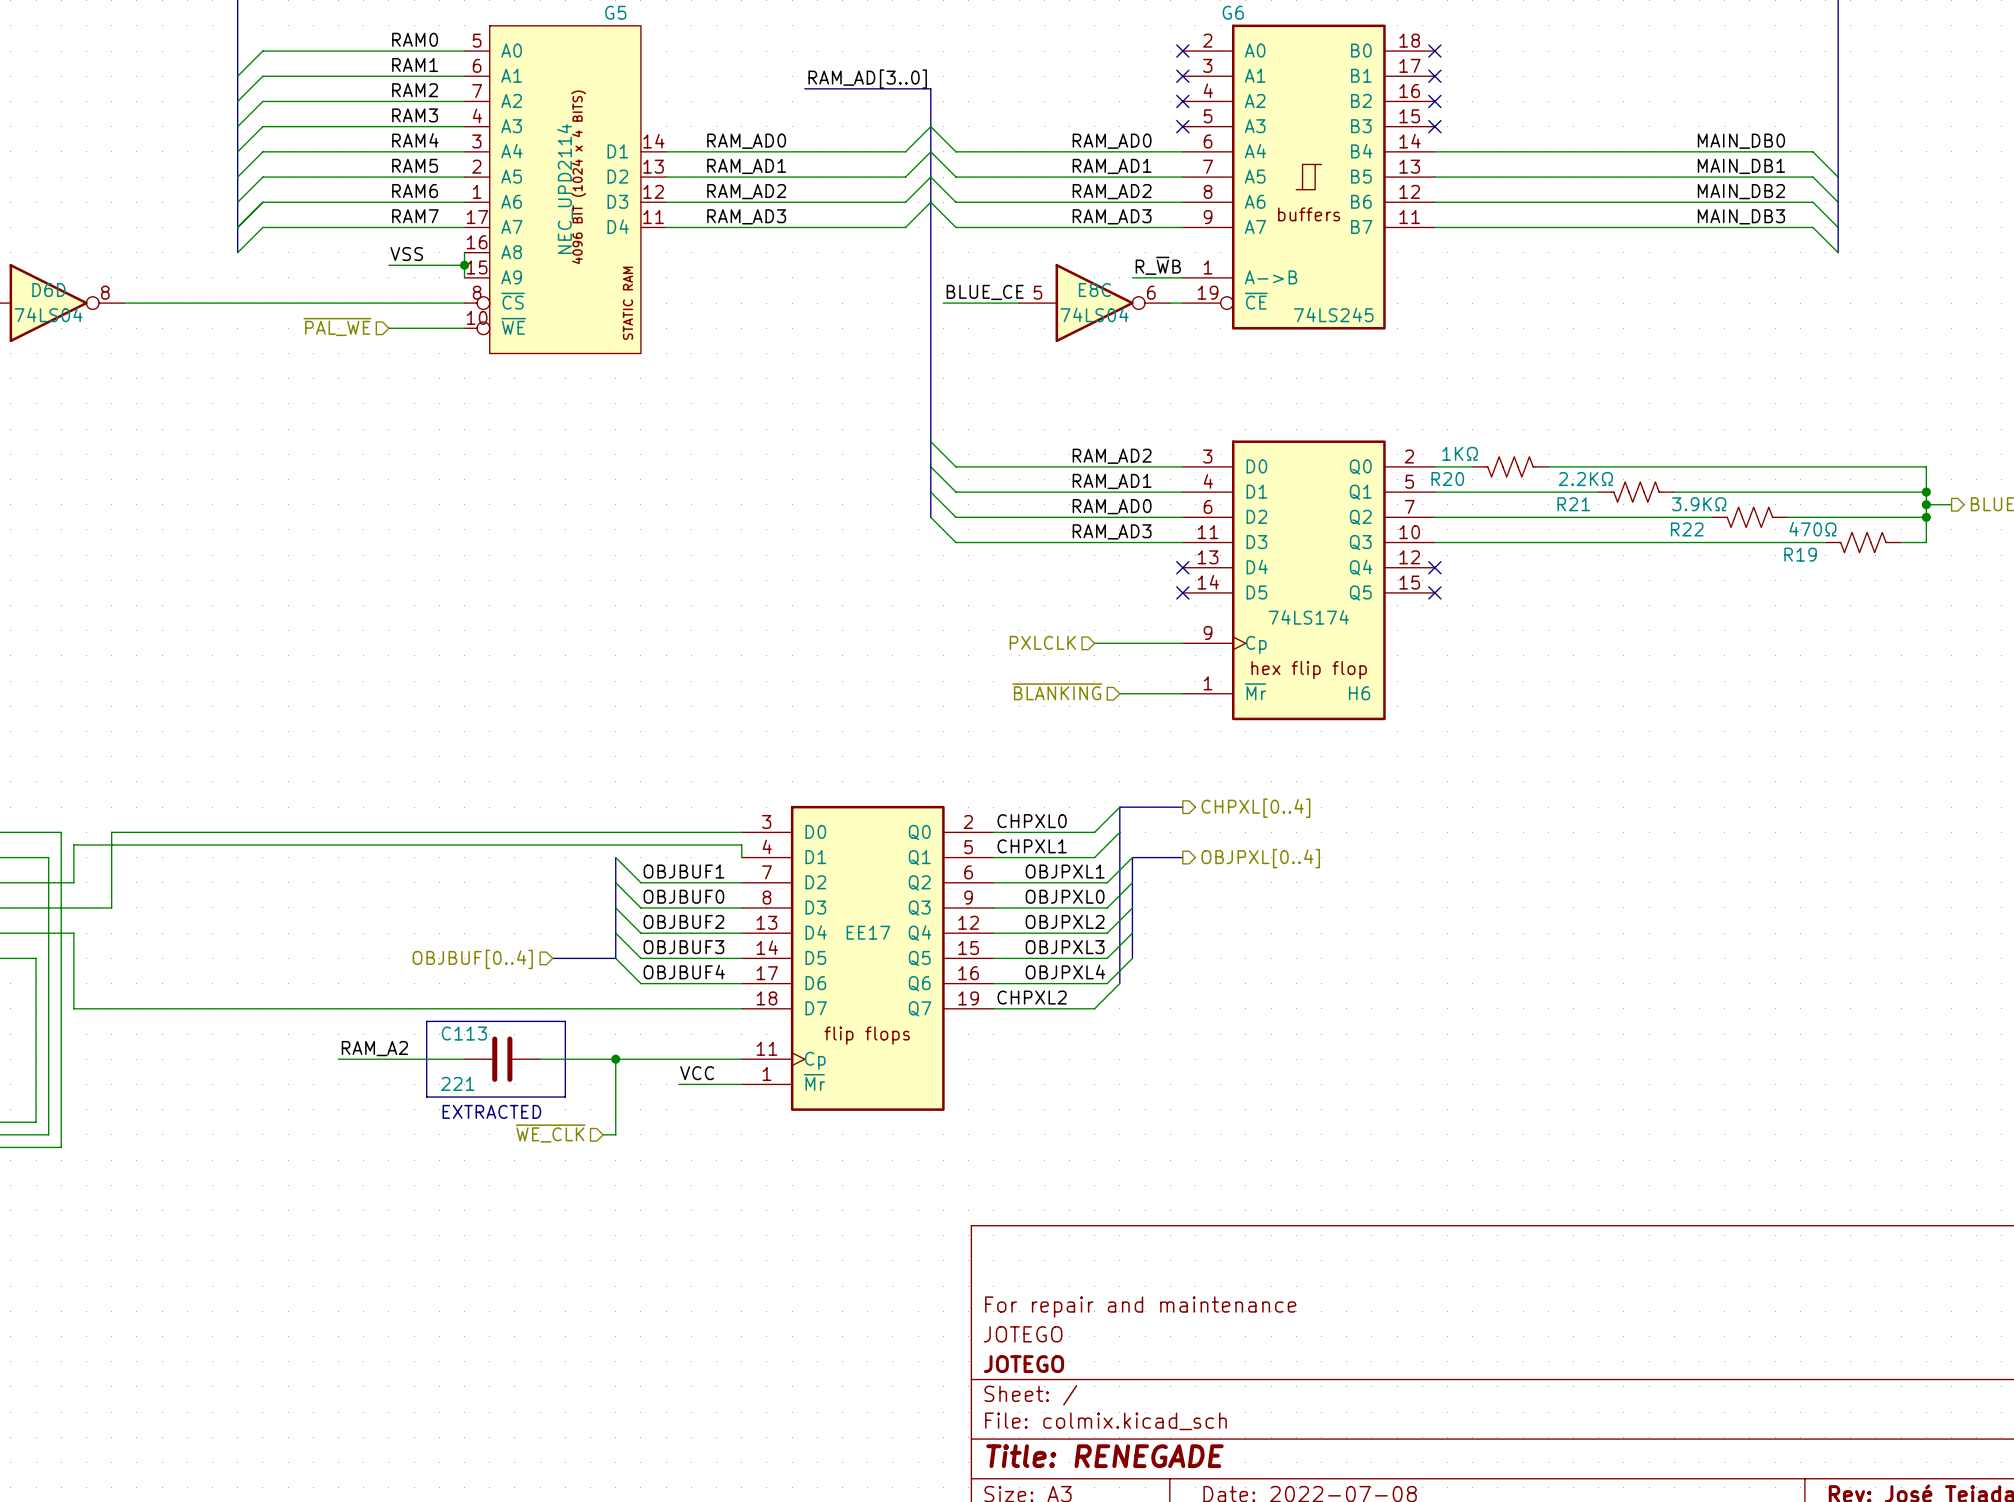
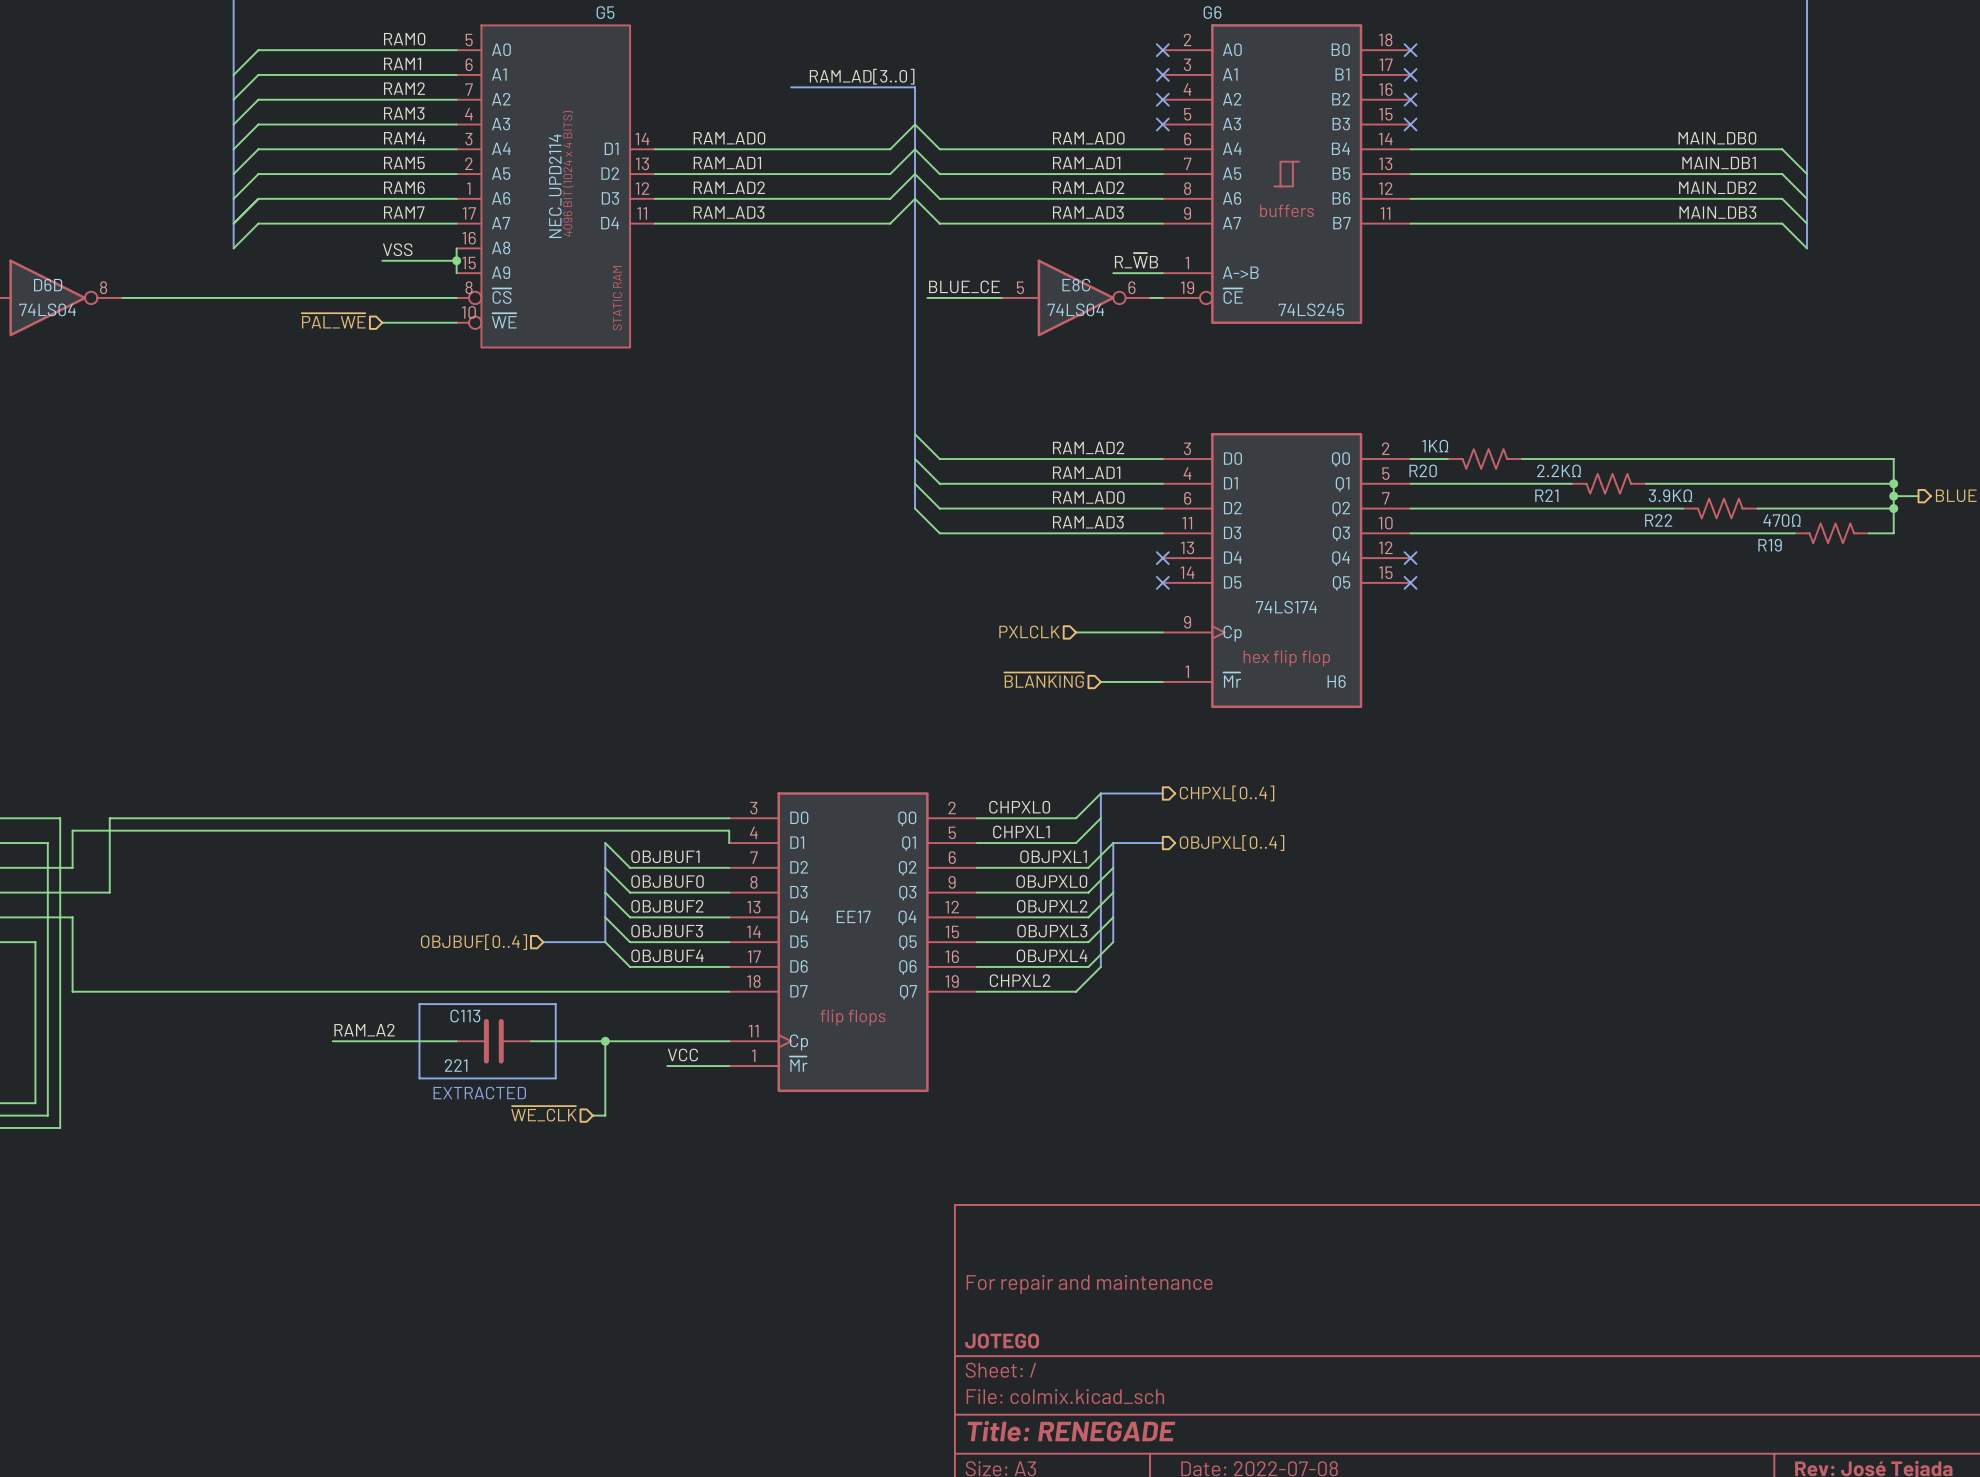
title block: JOTEGO (1023, 1334) -> none

